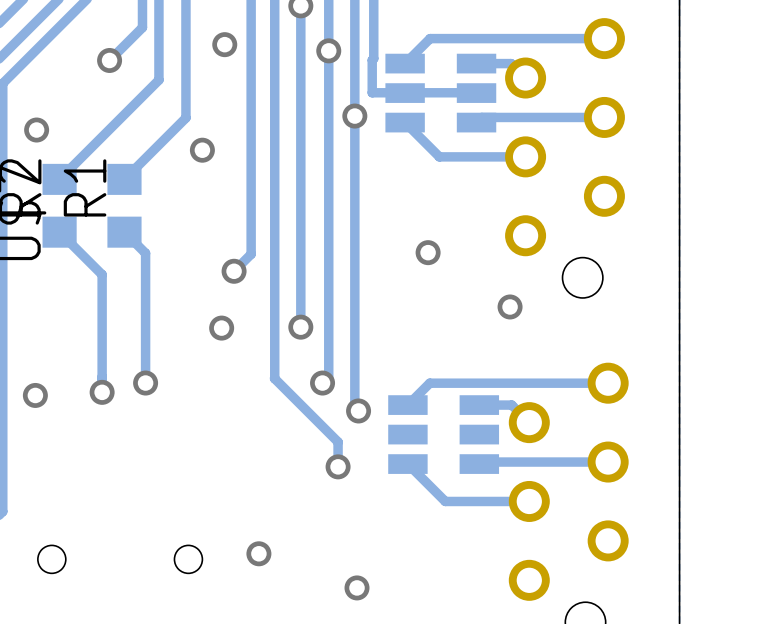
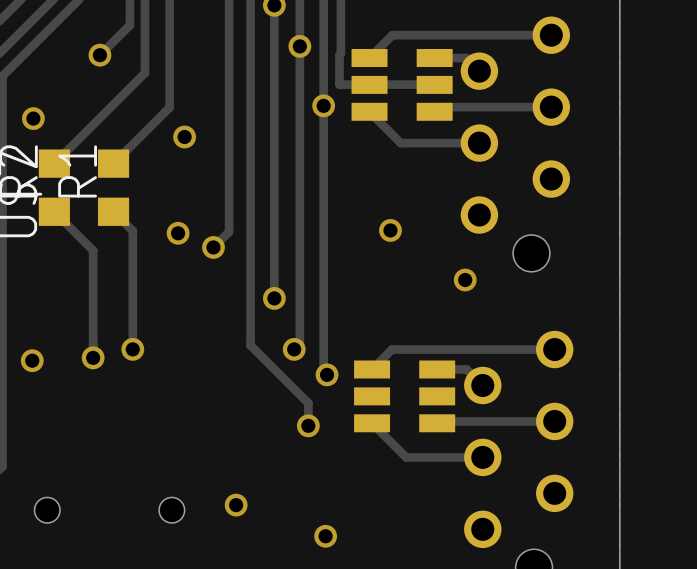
via: (224, 44) -> none
via position: (221, 328) -> (178, 233)

